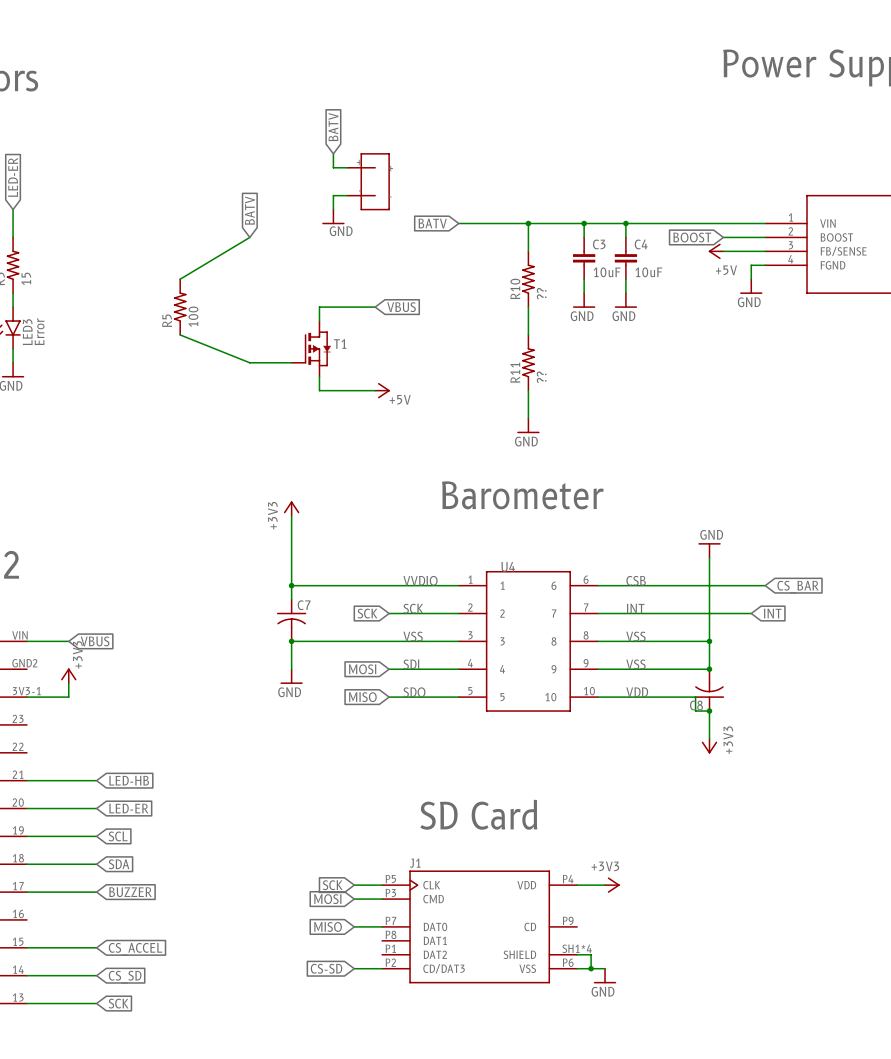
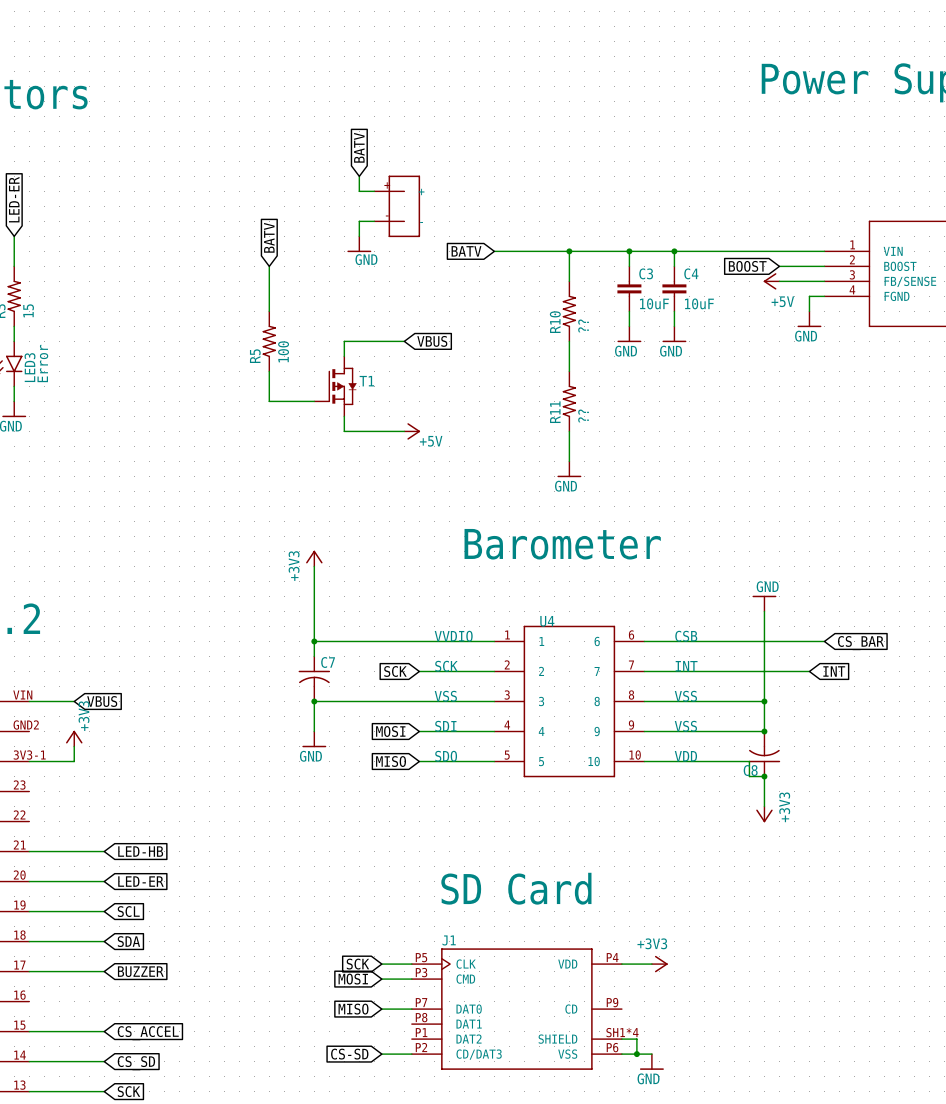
wire: (249, 237) (180, 279) -> (269, 266) (269, 311)
R5 position: (180, 307) -> (269, 341)
wire: (180, 334) (249, 362) -> (269, 371) (269, 401)

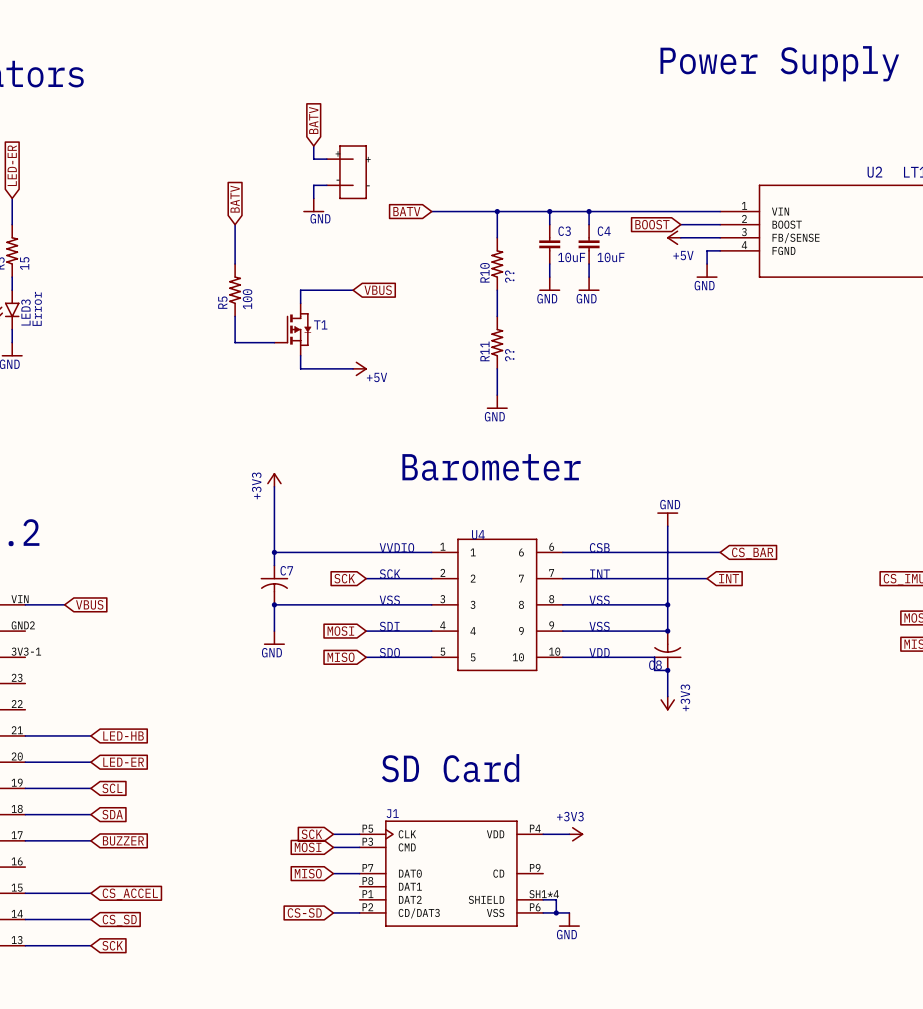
power symbol: +3V3 (74, 738) -> none
wire: (74, 746) (74, 761) (29, 761) -> none

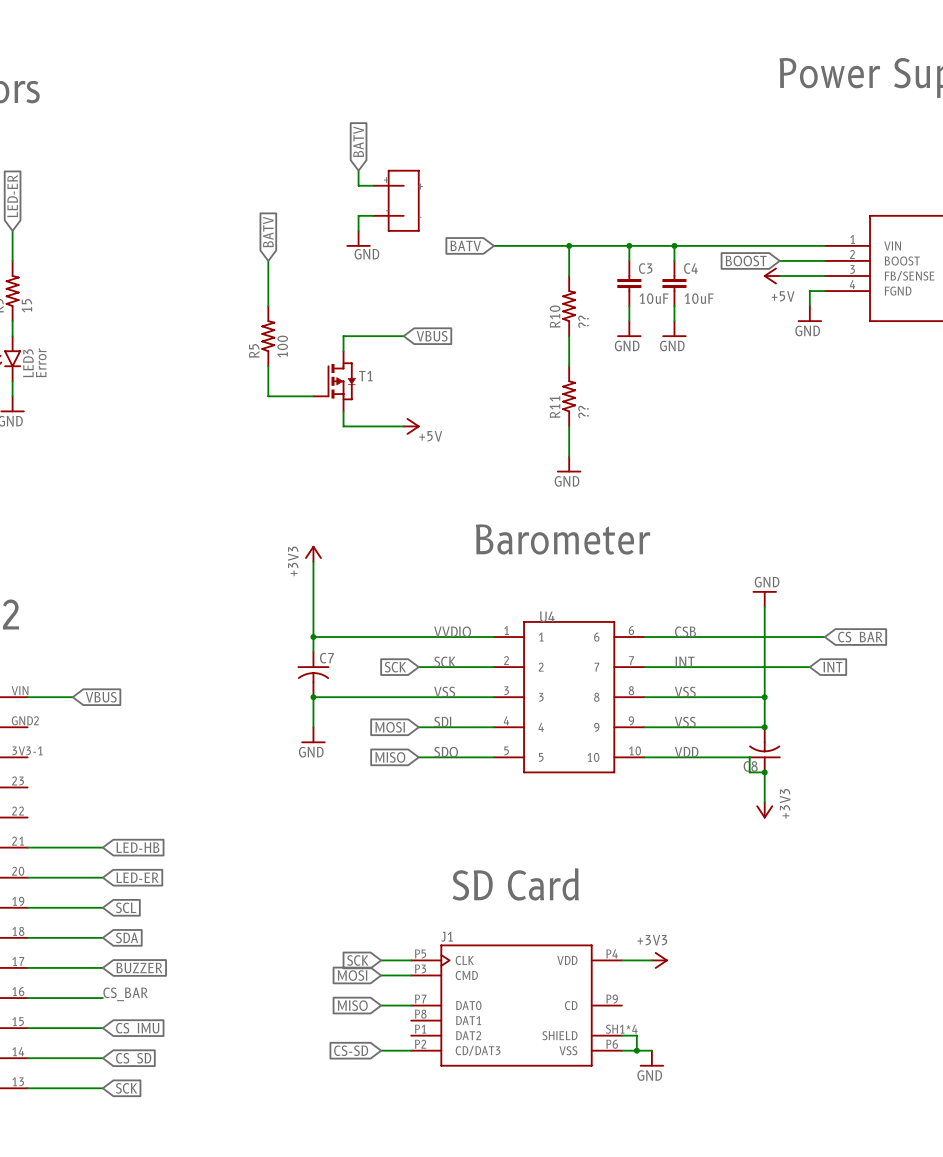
label: none -> CS_BAR (125, 994)
wire: none -> (27, 998) (102, 998)
global label: CS_ACCEL (130, 894) -> CS_IMU (137, 1029)

